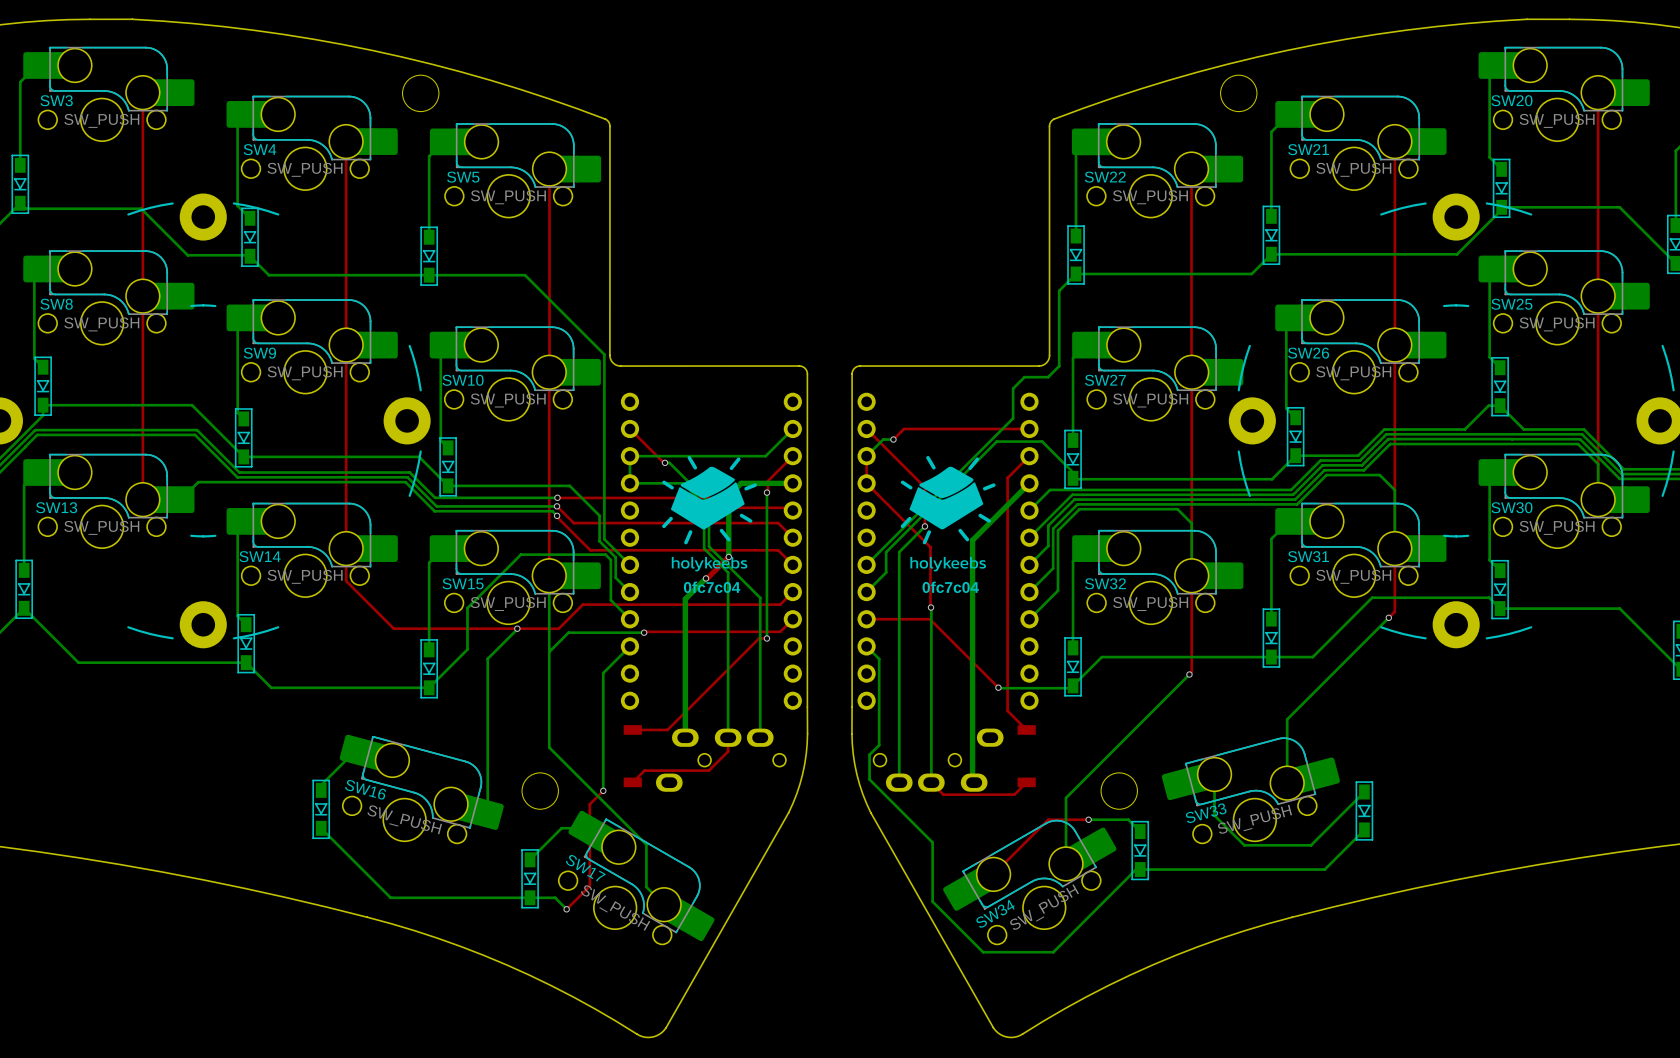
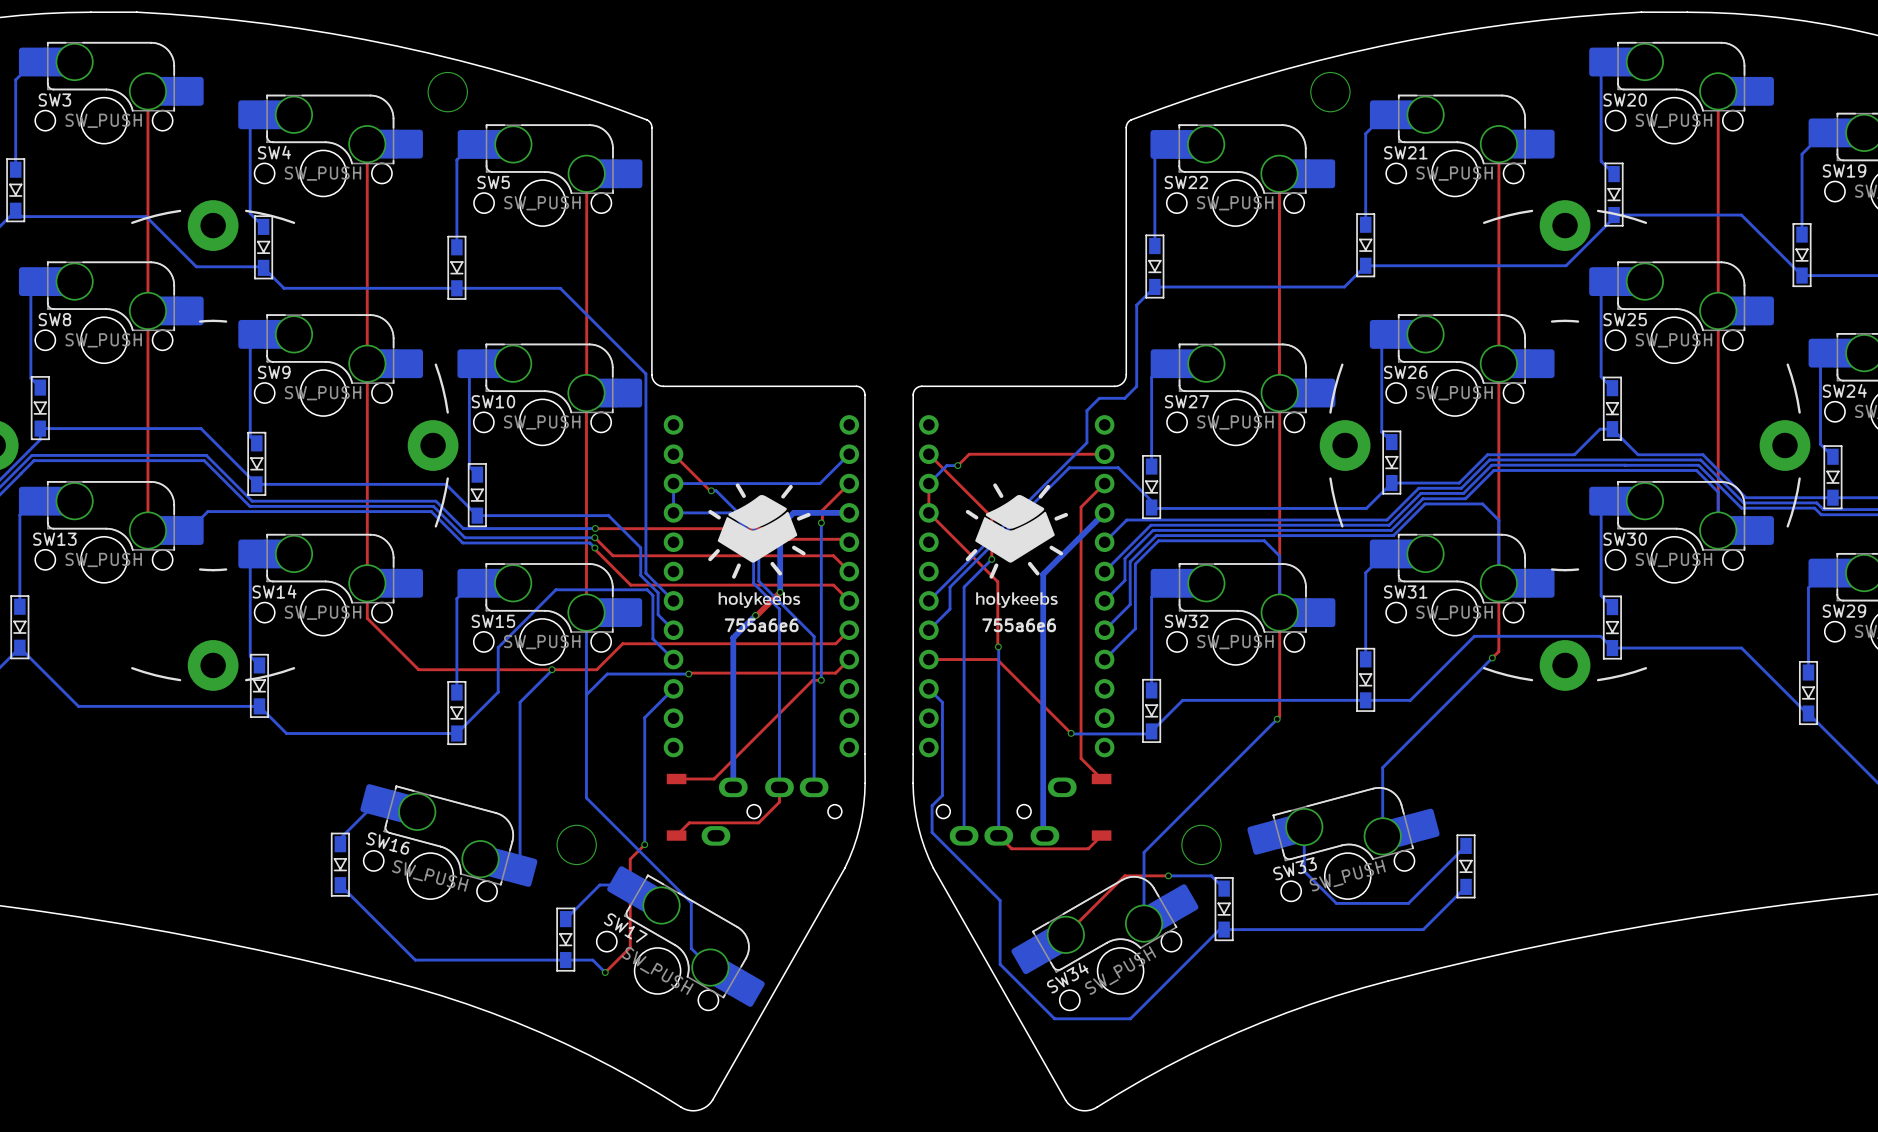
text: 0fc7c04 (712, 587) -> 755a6e6 (761, 625)
text: 0fc7c04 (950, 587) -> 755a6e6 (1019, 625)

